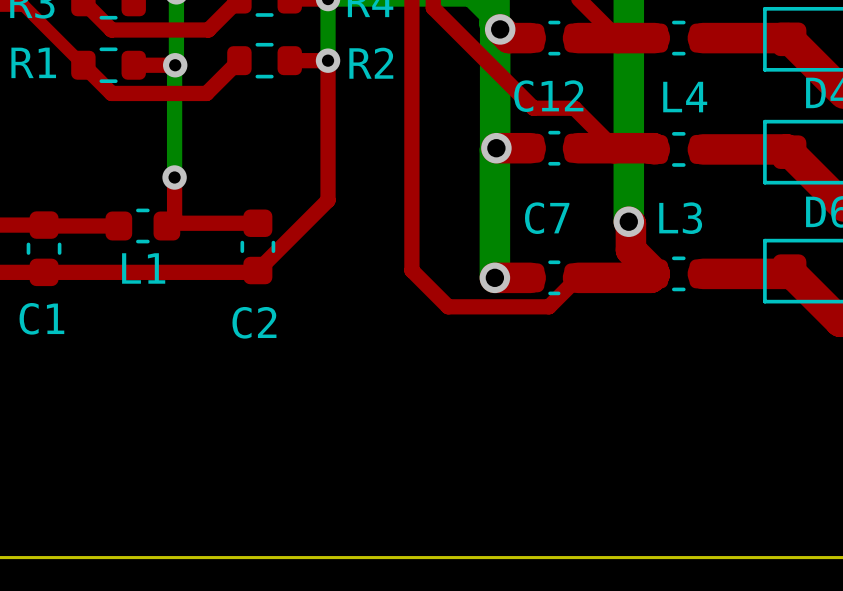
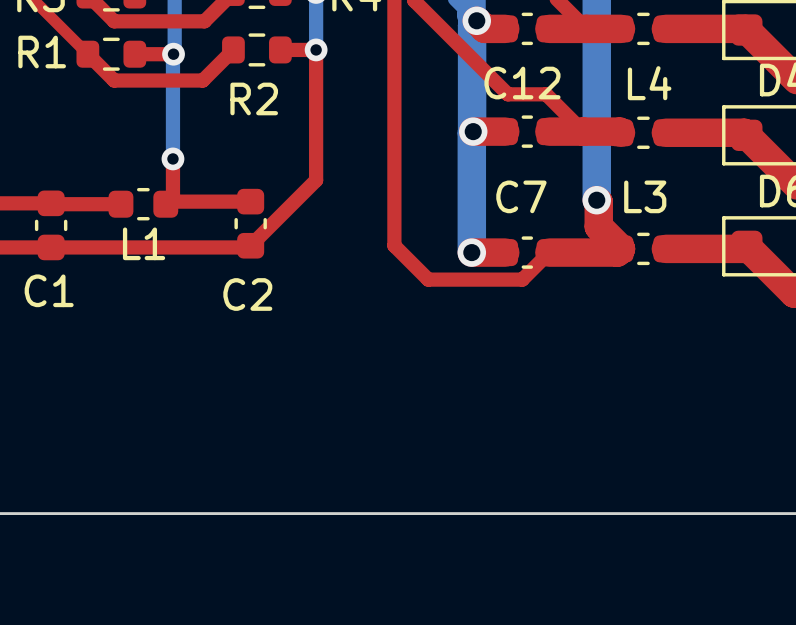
R2 name position: R2 (371, 63) -> R2 (254, 98)

